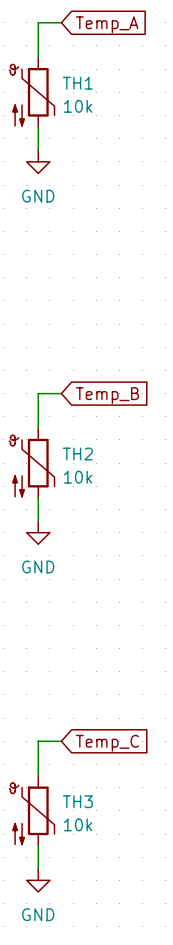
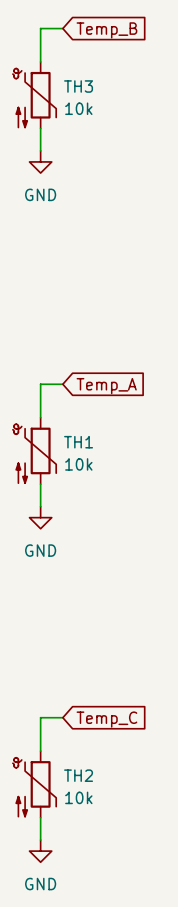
global label: Temp_A (107, 24) -> Temp_B (106, 30)
TH1 name: TH1 (77, 83) -> TH3 (78, 86)
global label: Temp_B (107, 395) -> Temp_A (106, 386)
TH2 name: TH2 (77, 454) -> TH1 (78, 442)
TH3 name: TH3 (77, 801) -> TH2 (78, 775)

